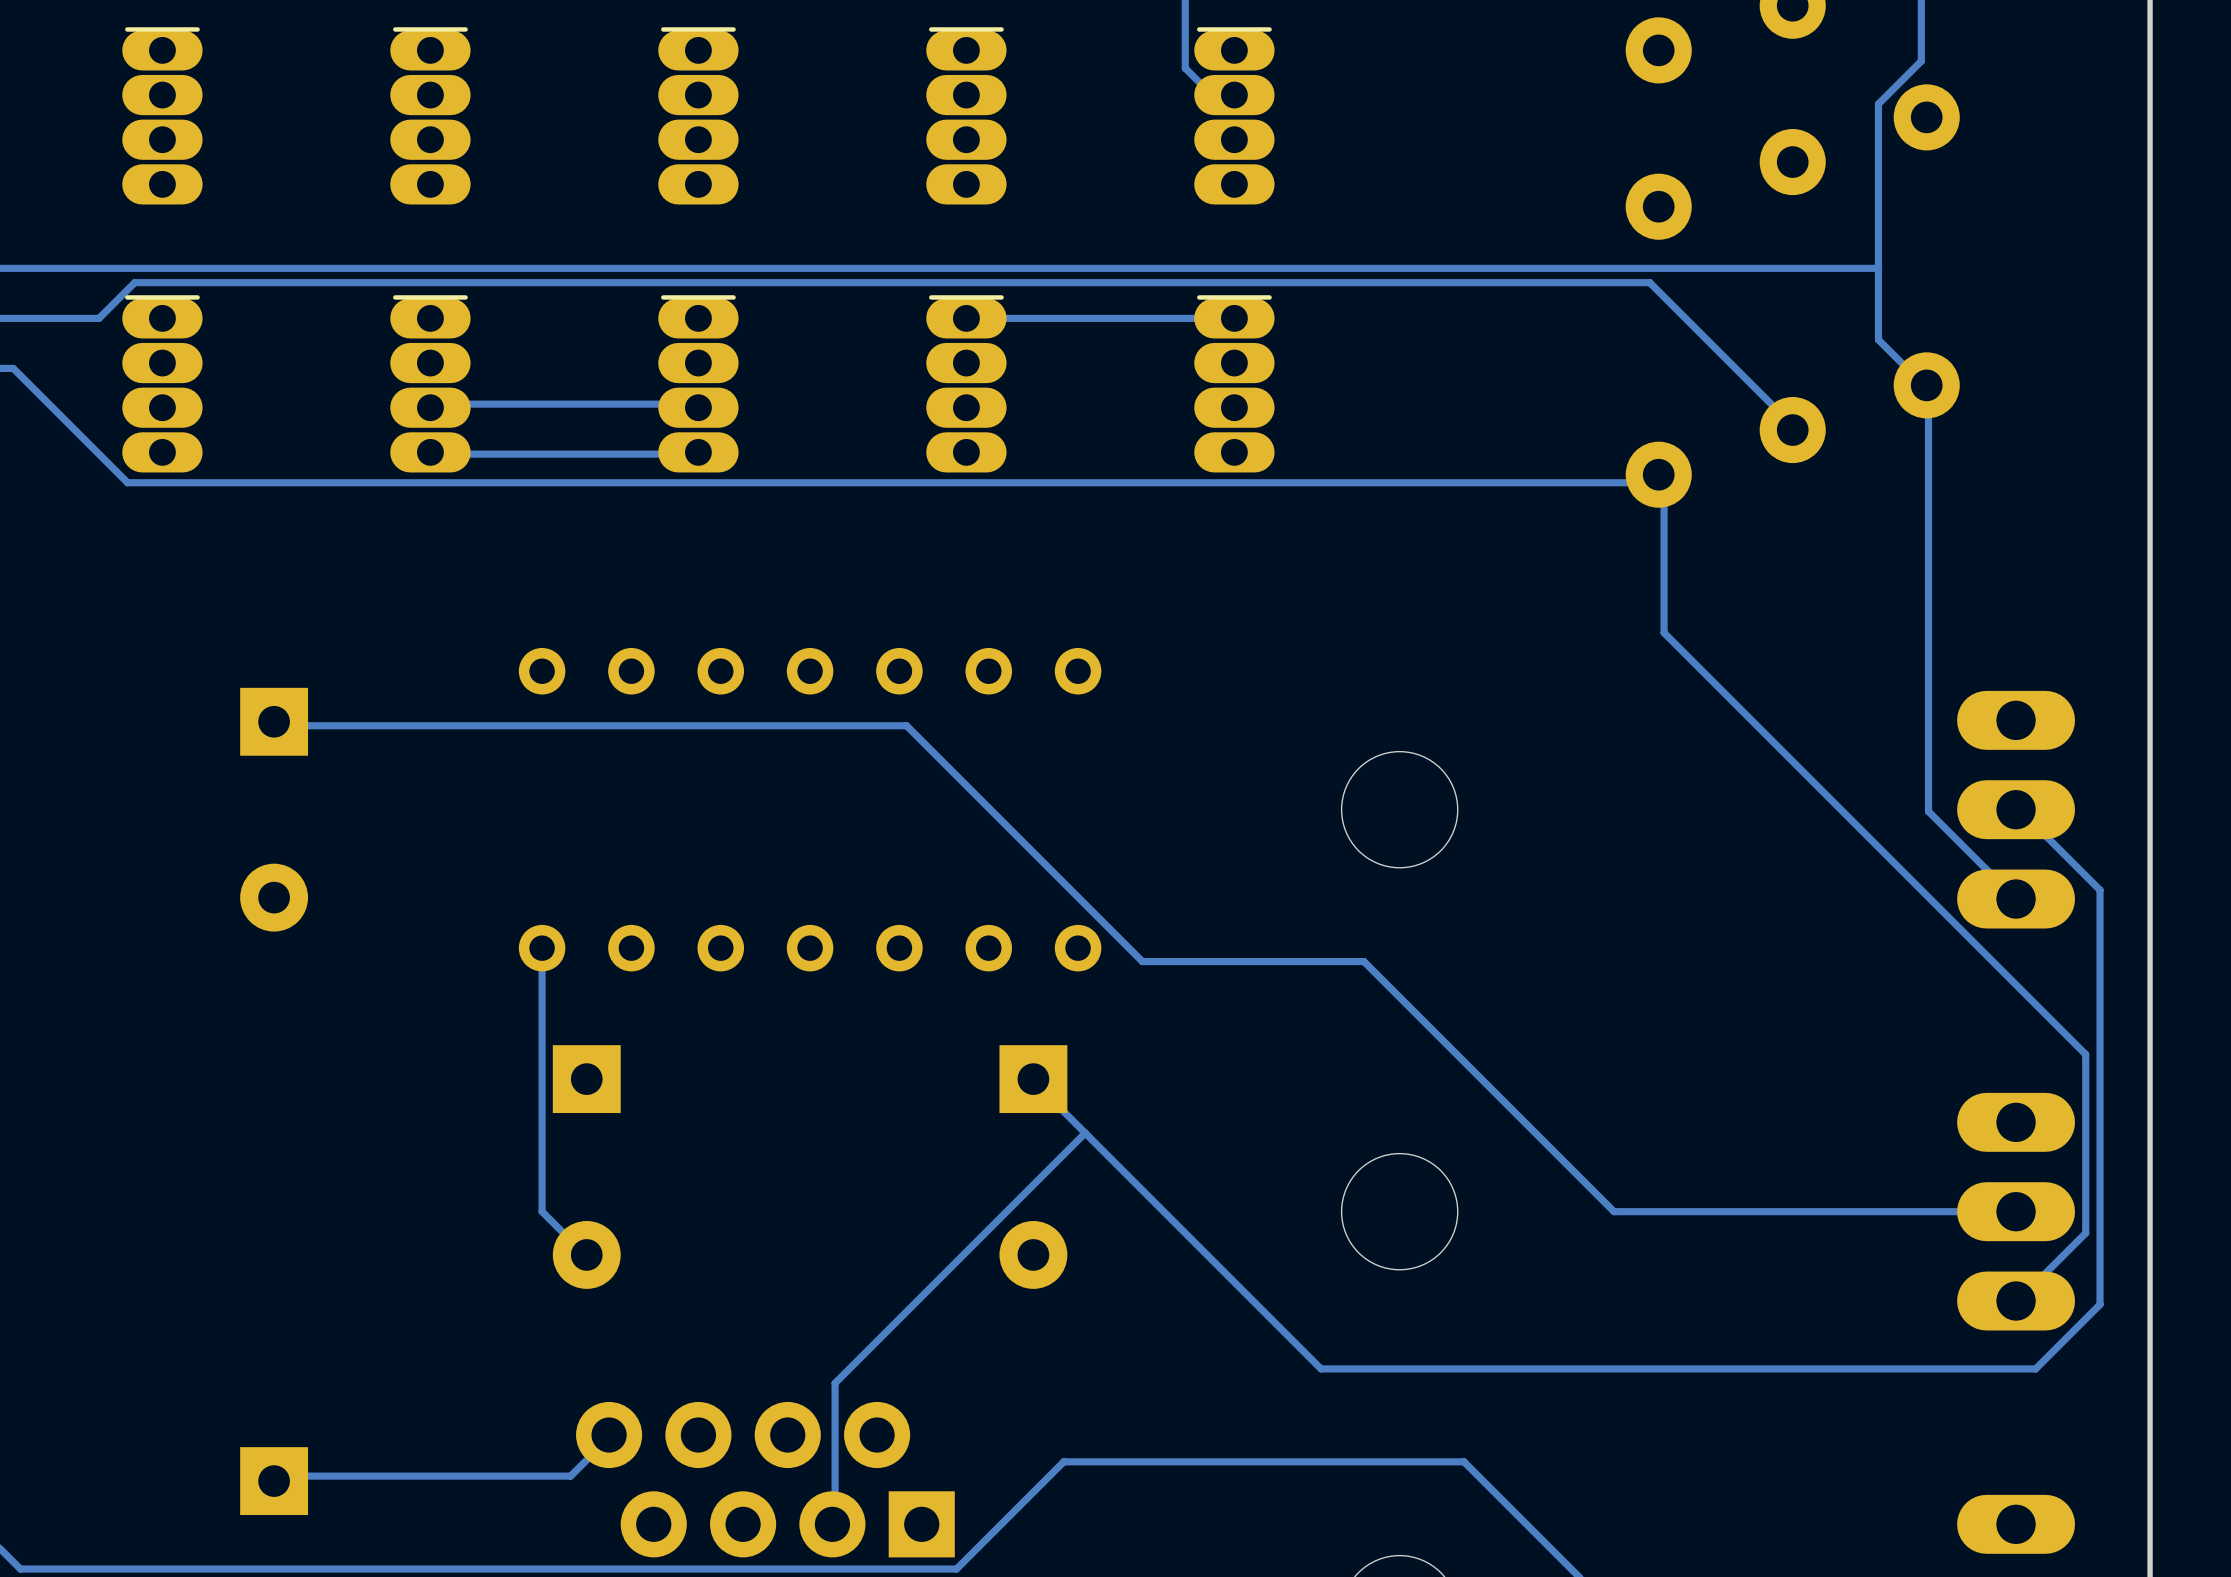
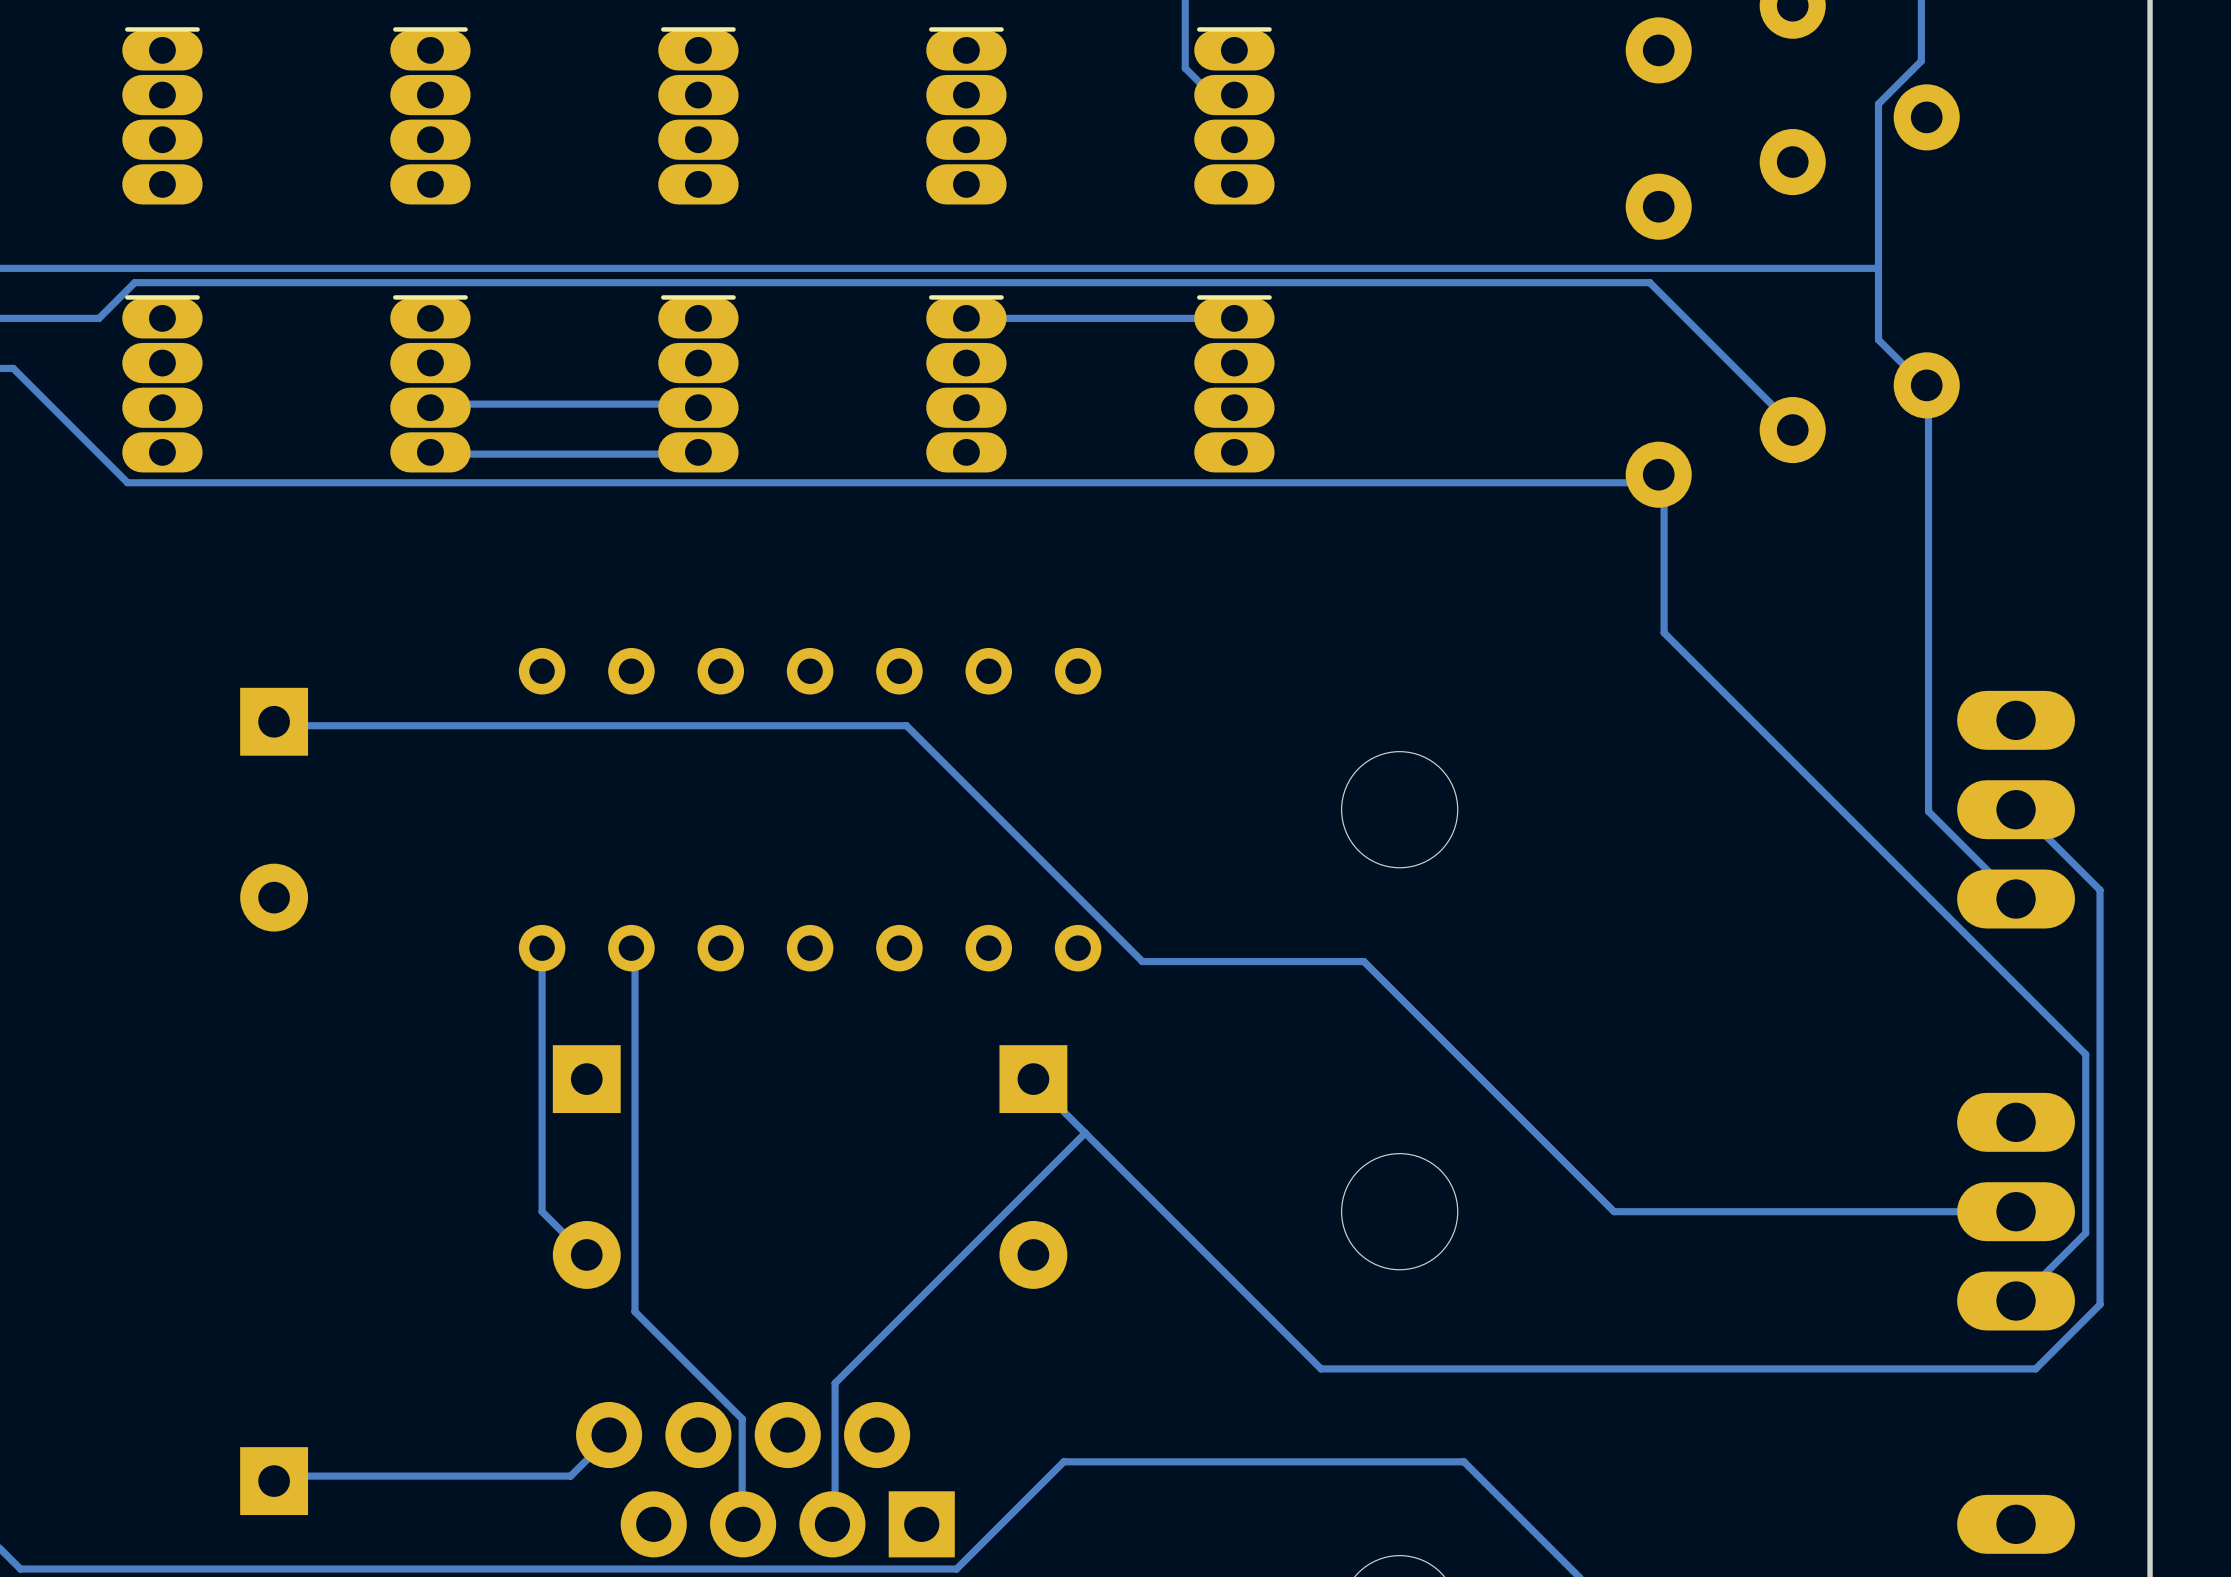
track: none -> (631, 948) (635, 954) (635, 1311) (742, 1418) (743, 1524)

